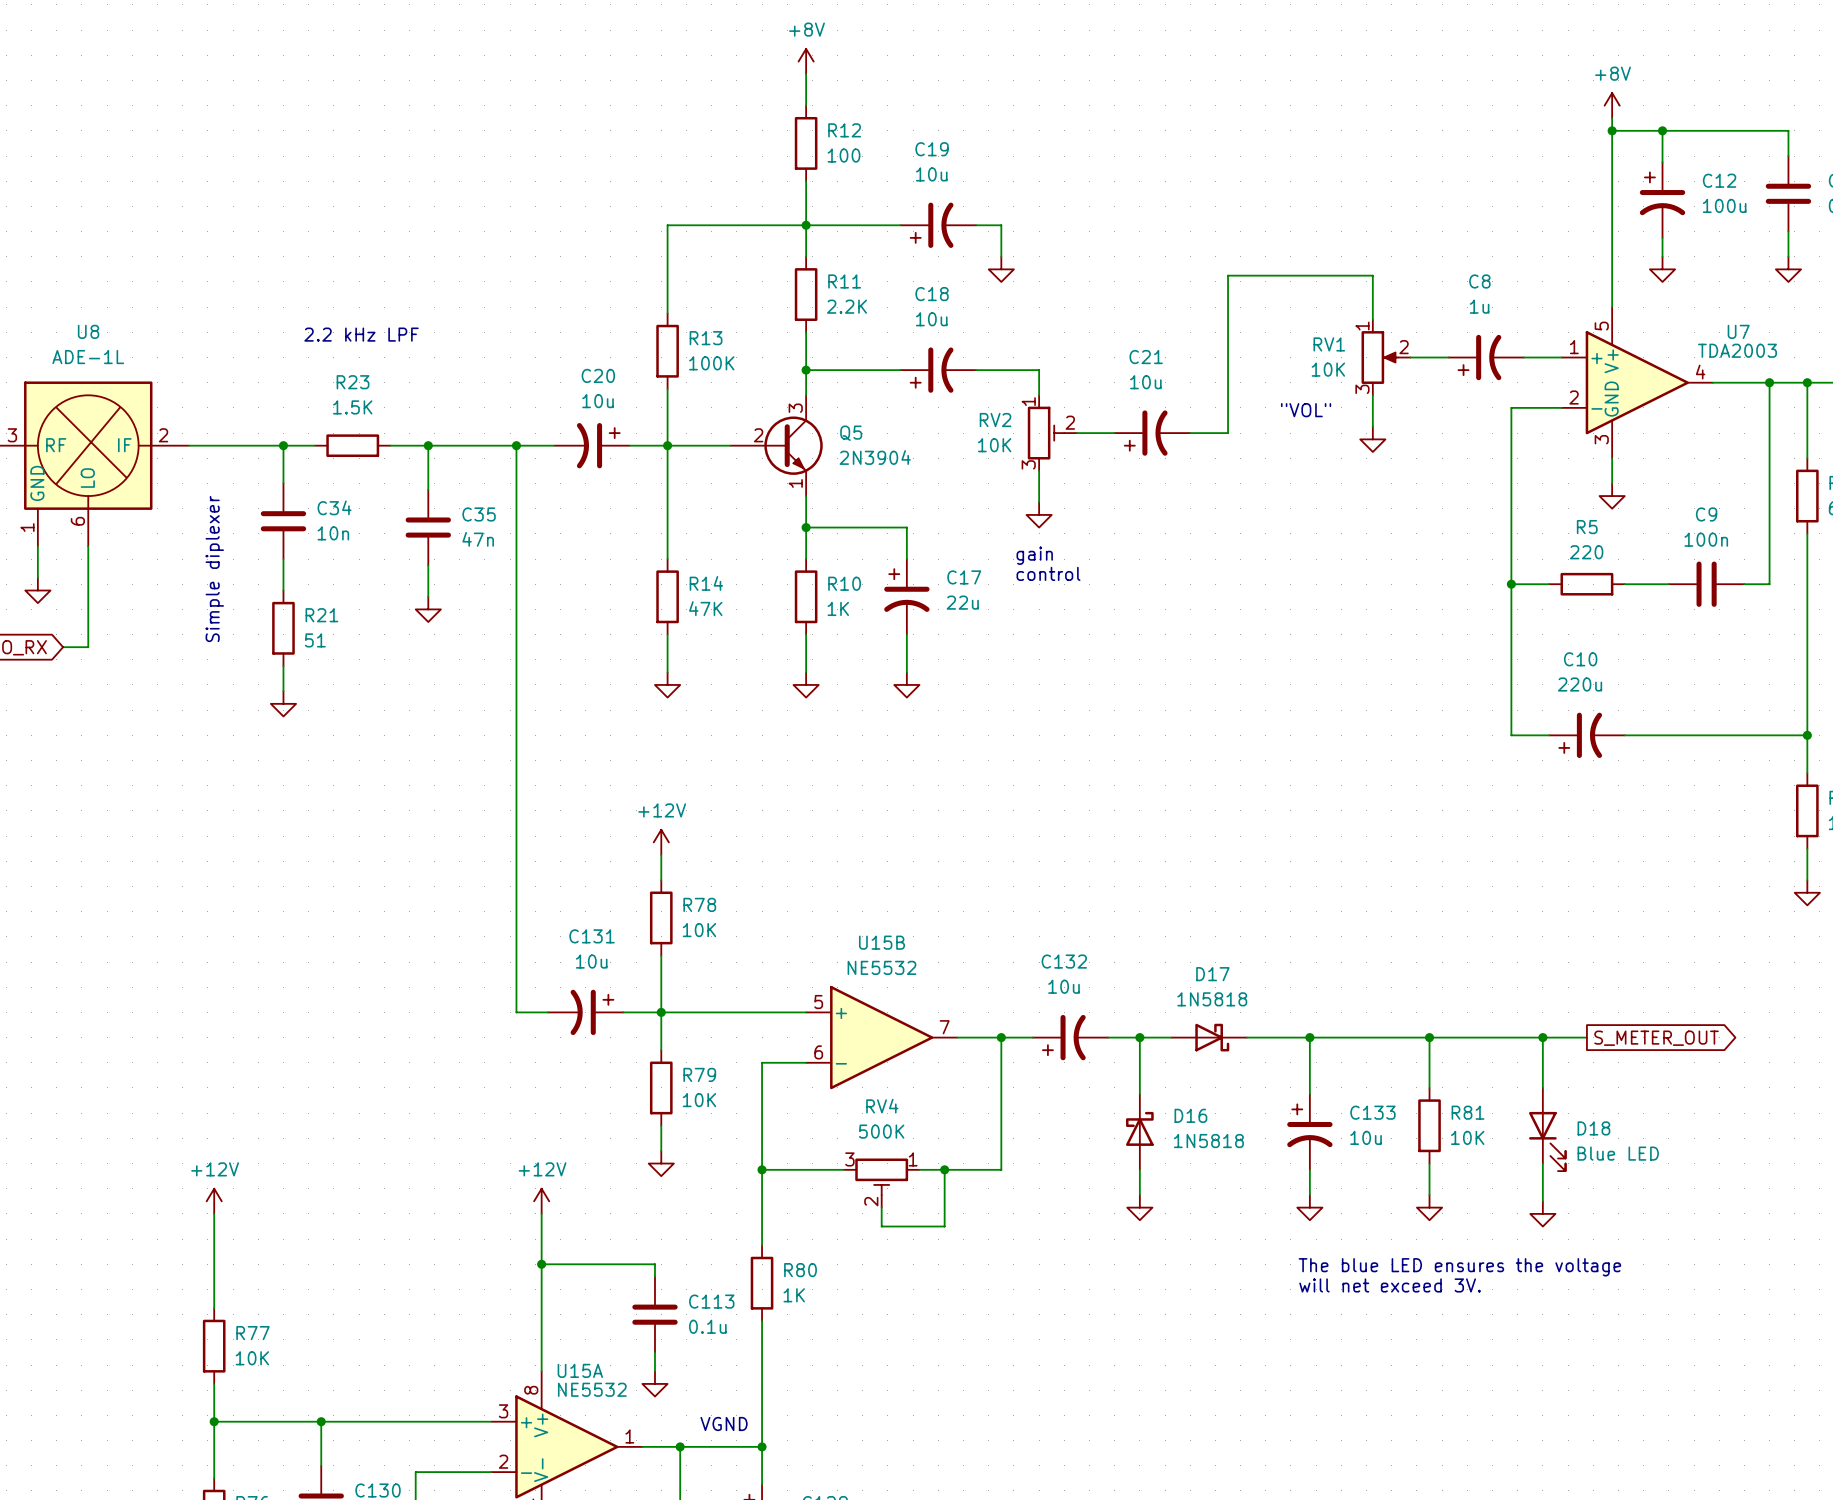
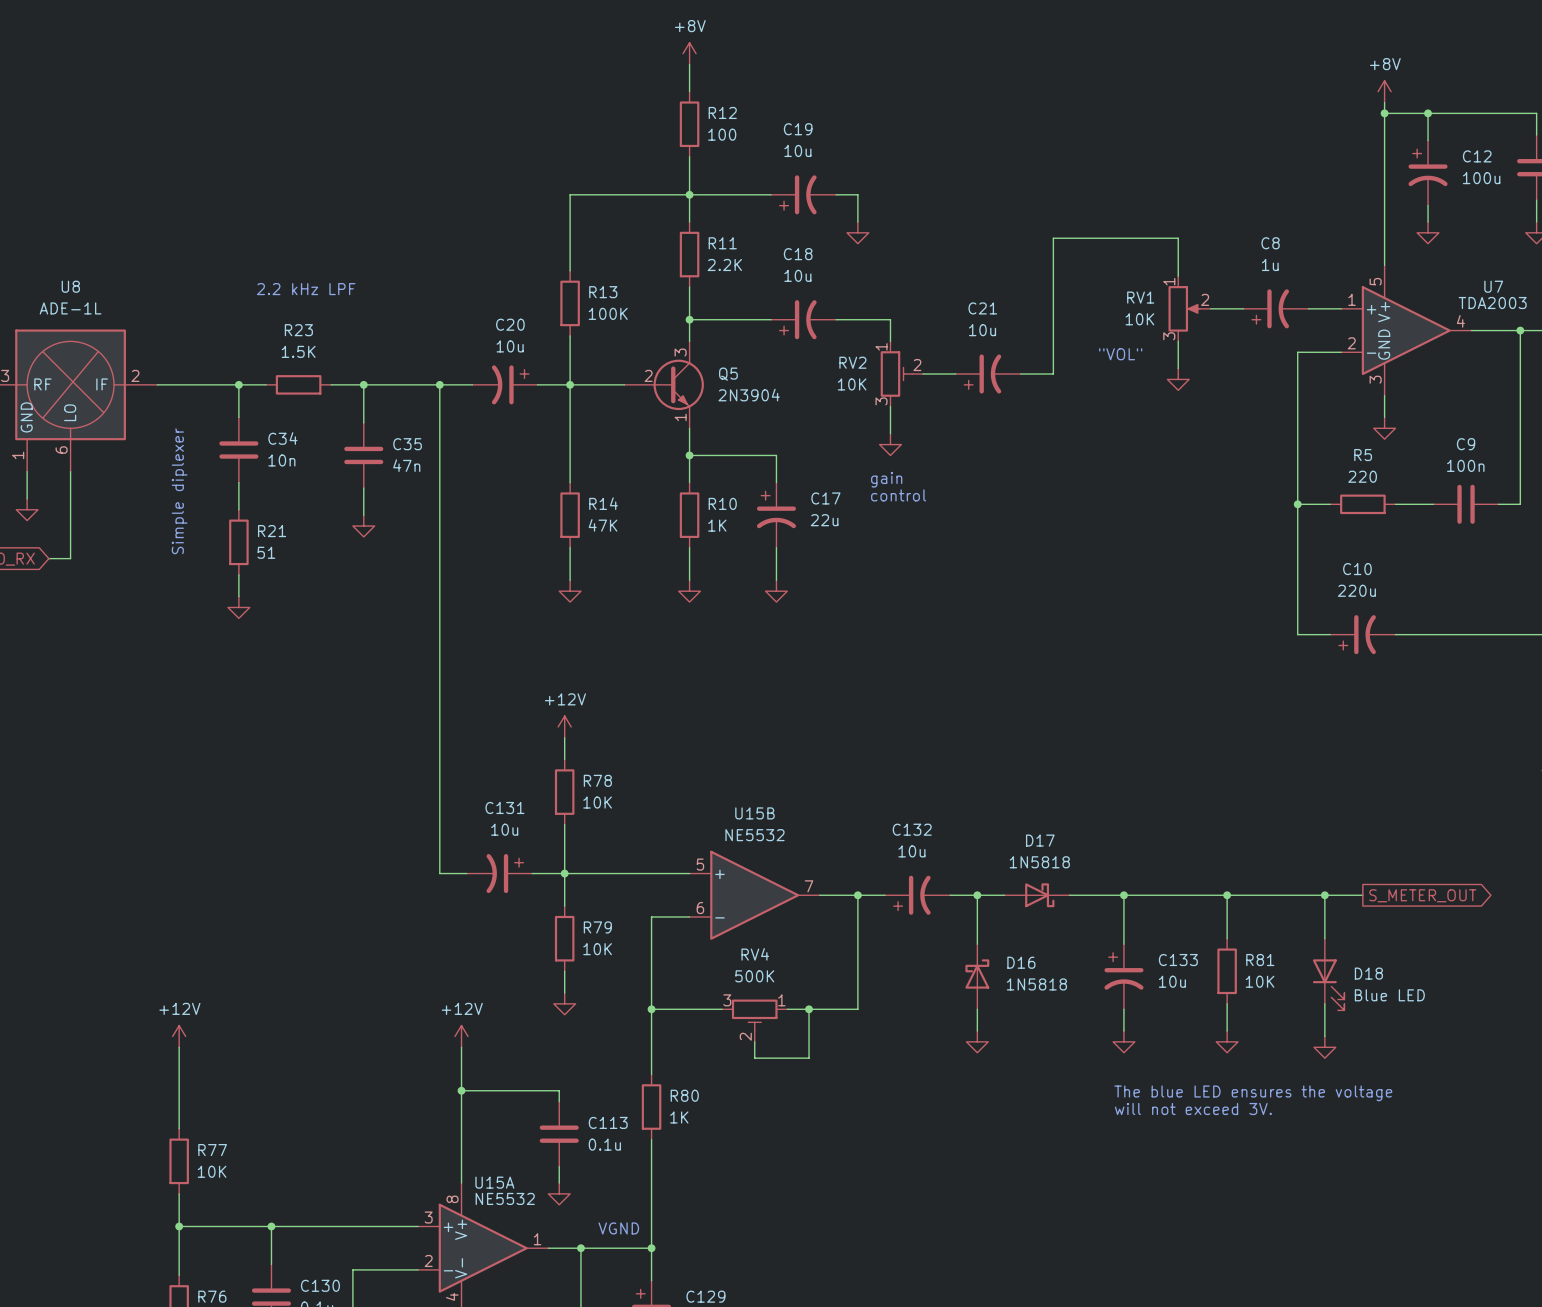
text: will net exceed 3V. (1390, 1285) -> will not exceed 3V. (1193, 1108)

